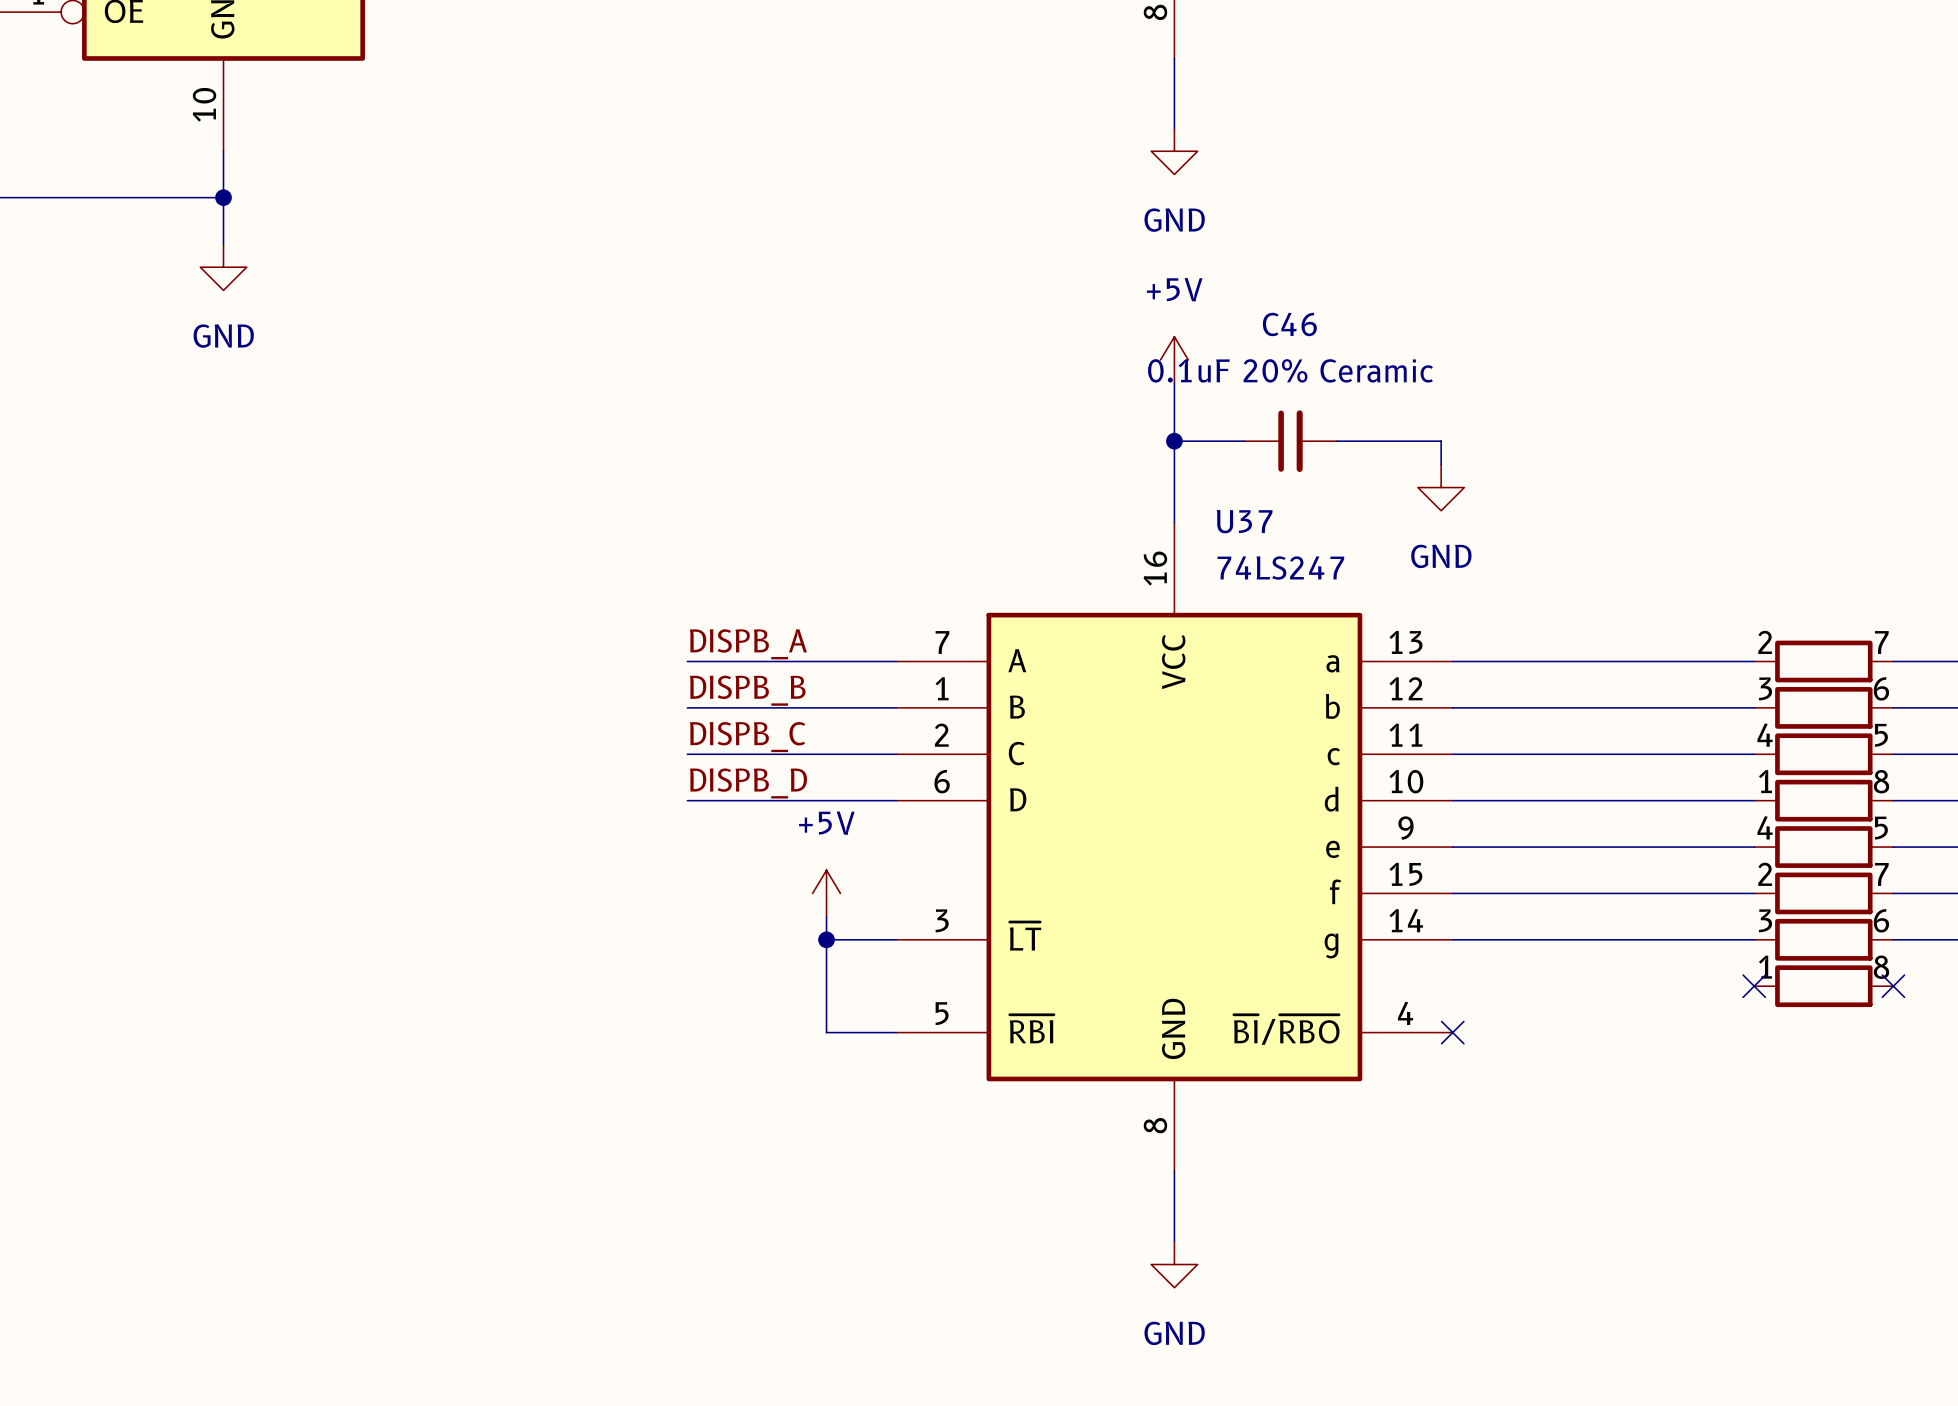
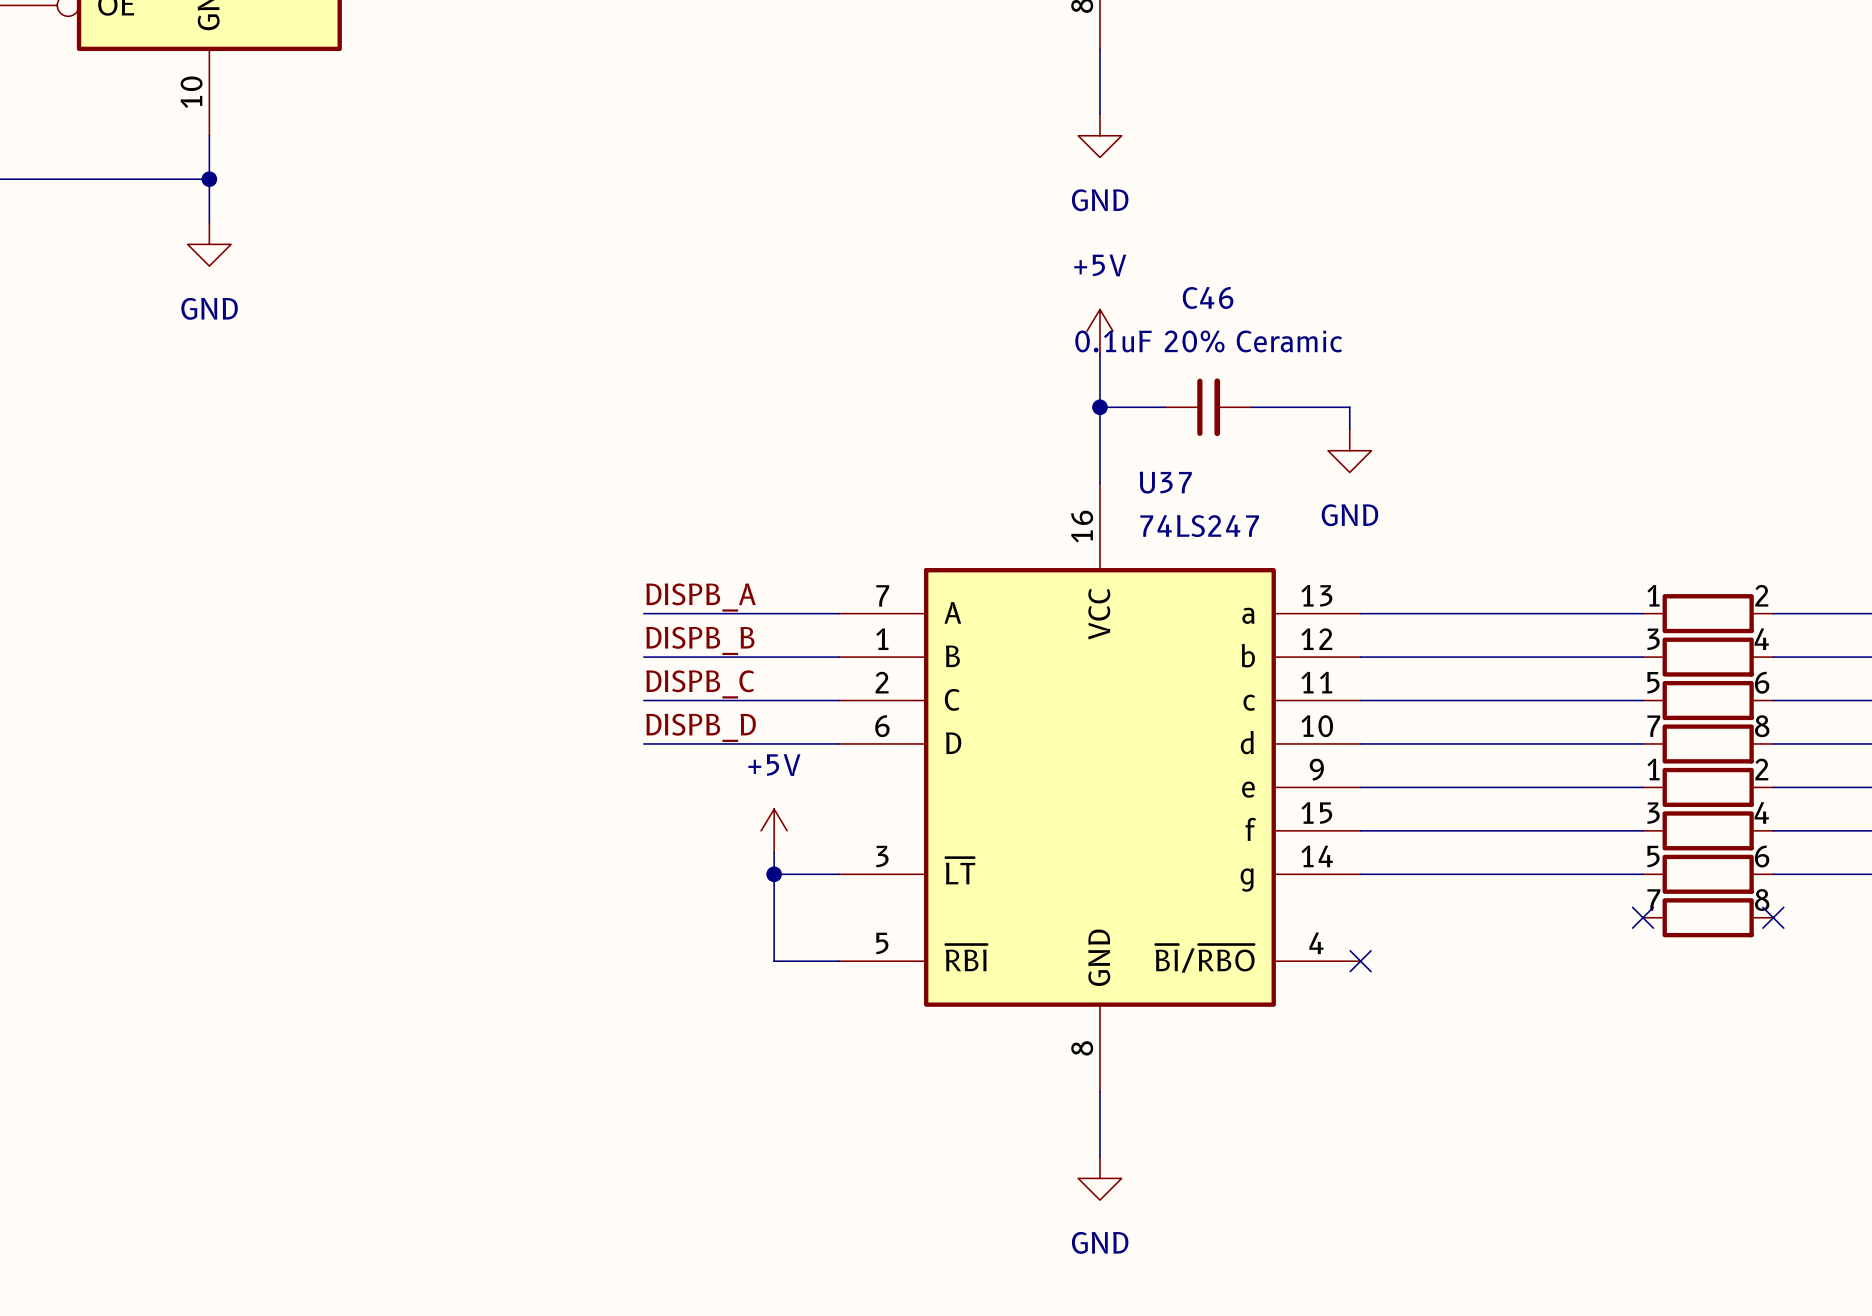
part pin number: 2 (1765, 642) -> 1 (1653, 595)
part pin number: 7 (1881, 642) -> 2 (1761, 595)
part pin number: 6 (1881, 688) -> 4 (1761, 639)
part pin number: 4 (1765, 735) -> 5 (1653, 682)
part pin number: 5 (1881, 735) -> 6 (1762, 682)
part pin number: 1 (1765, 781) -> 7 (1653, 726)
part pin number: 4 (1765, 827) -> 1 (1653, 769)
part pin number: 5 (1881, 828) -> 2 (1761, 769)
part pin number: 2 (1765, 874) -> 3 (1653, 813)
part pin number: 7 (1881, 874) -> 4 (1761, 812)
part pin number: 3 (1765, 920) -> 5 (1653, 856)
part pin number: 1 (1765, 967) -> 7 (1653, 899)

